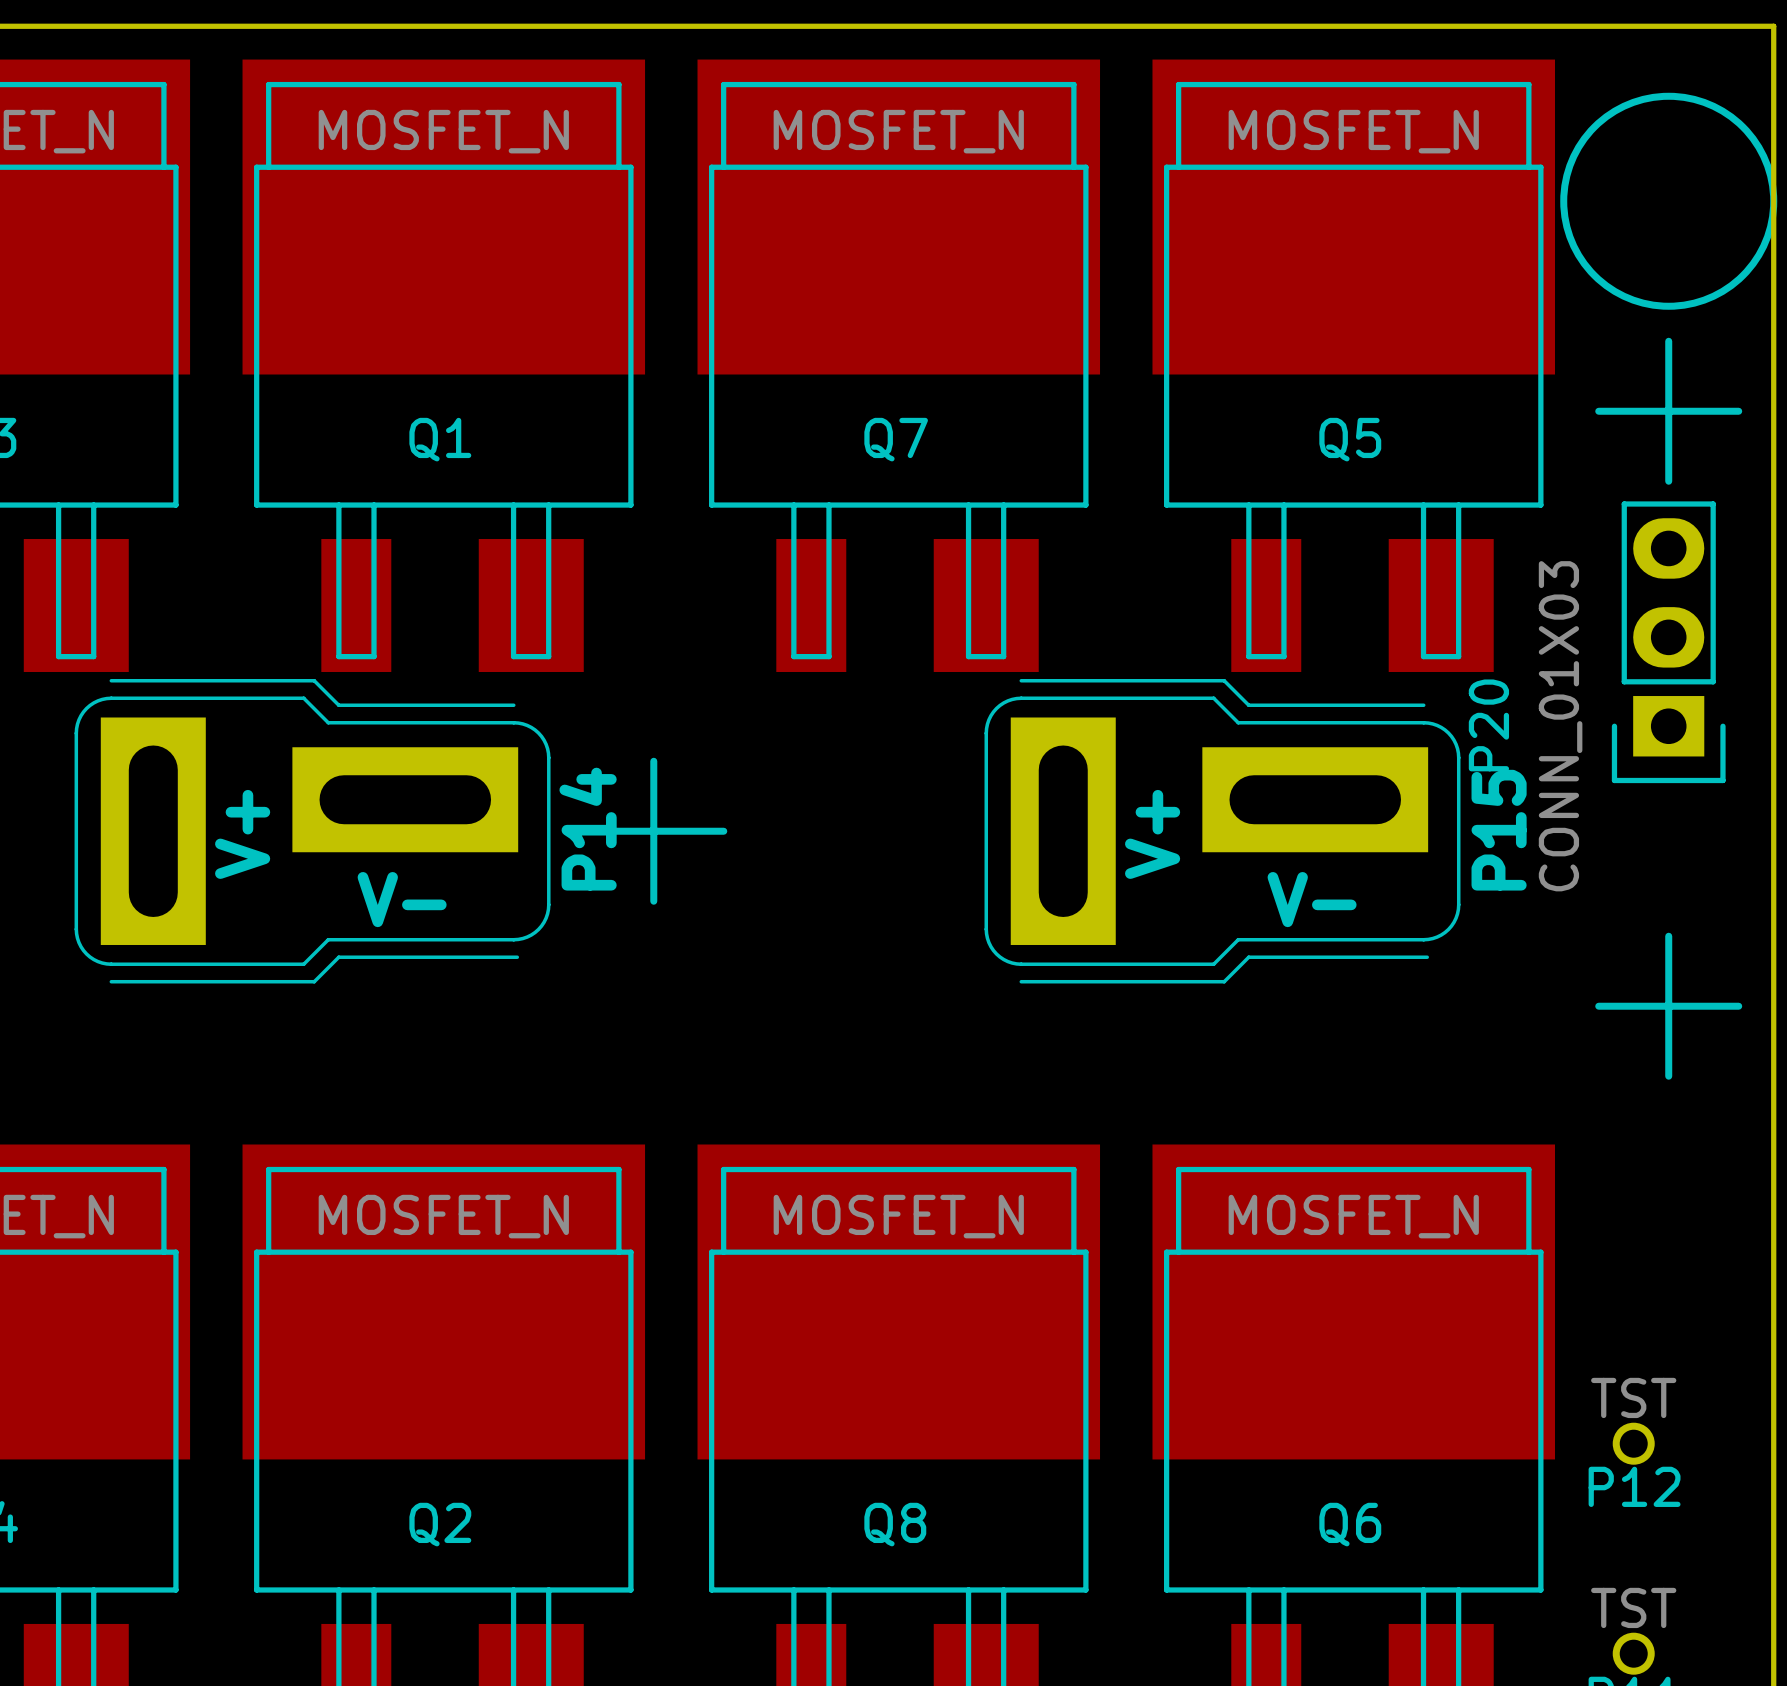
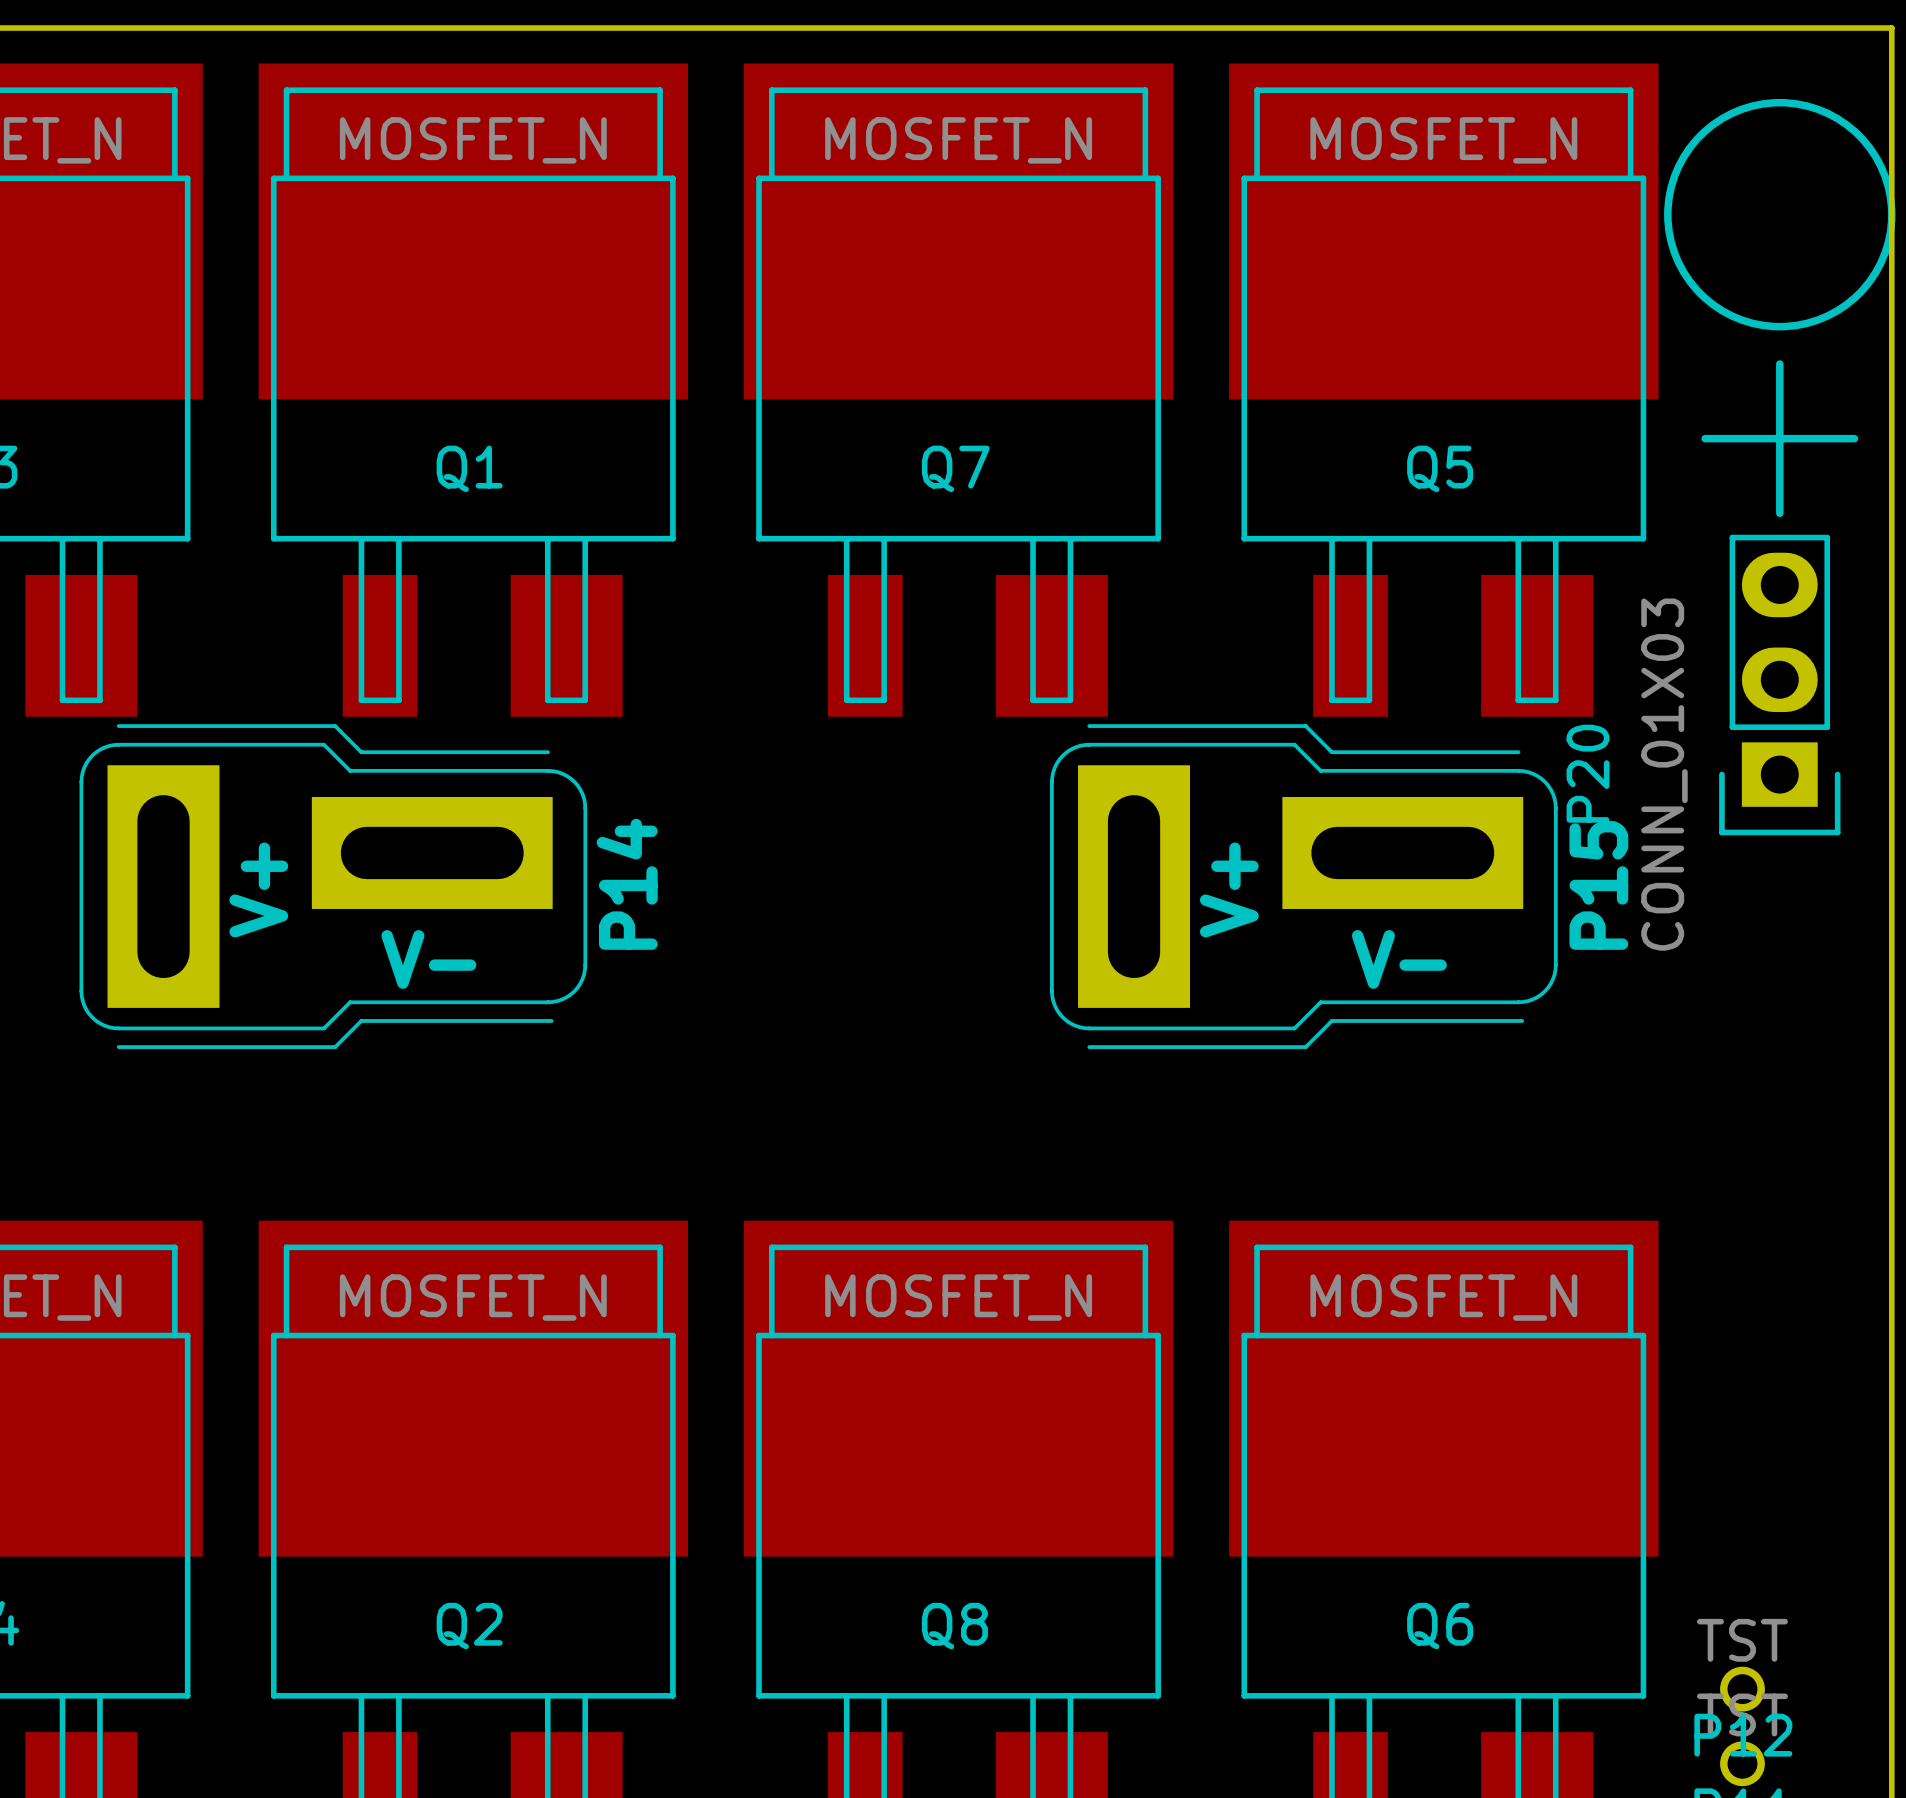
line: (653, 761) (653, 901) -> none
line: (583, 831) (723, 831) -> none
line: (1668, 936) (1668, 1076) -> none
line: (1598, 1006) (1738, 1006) -> none
P12 position: (1633, 1443) -> (1742, 1689)

